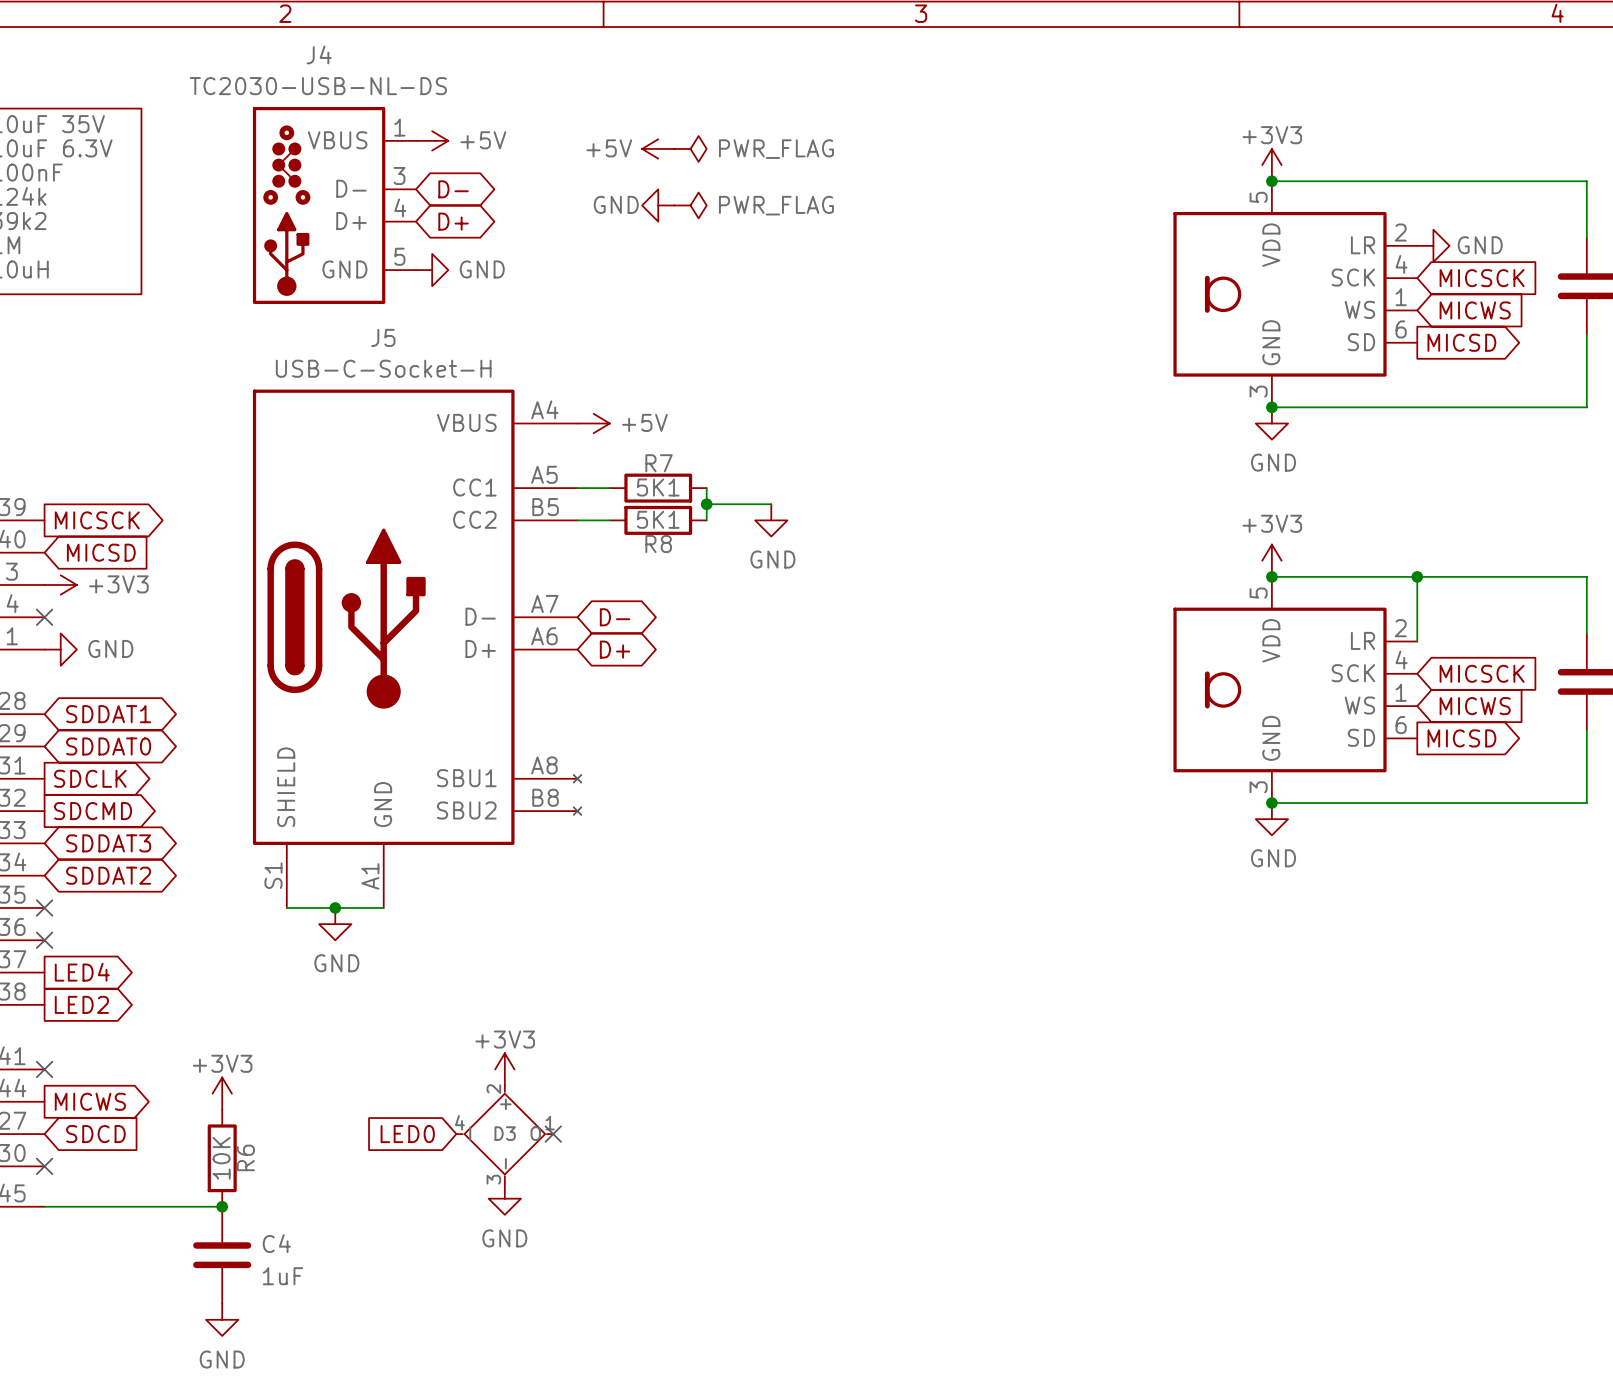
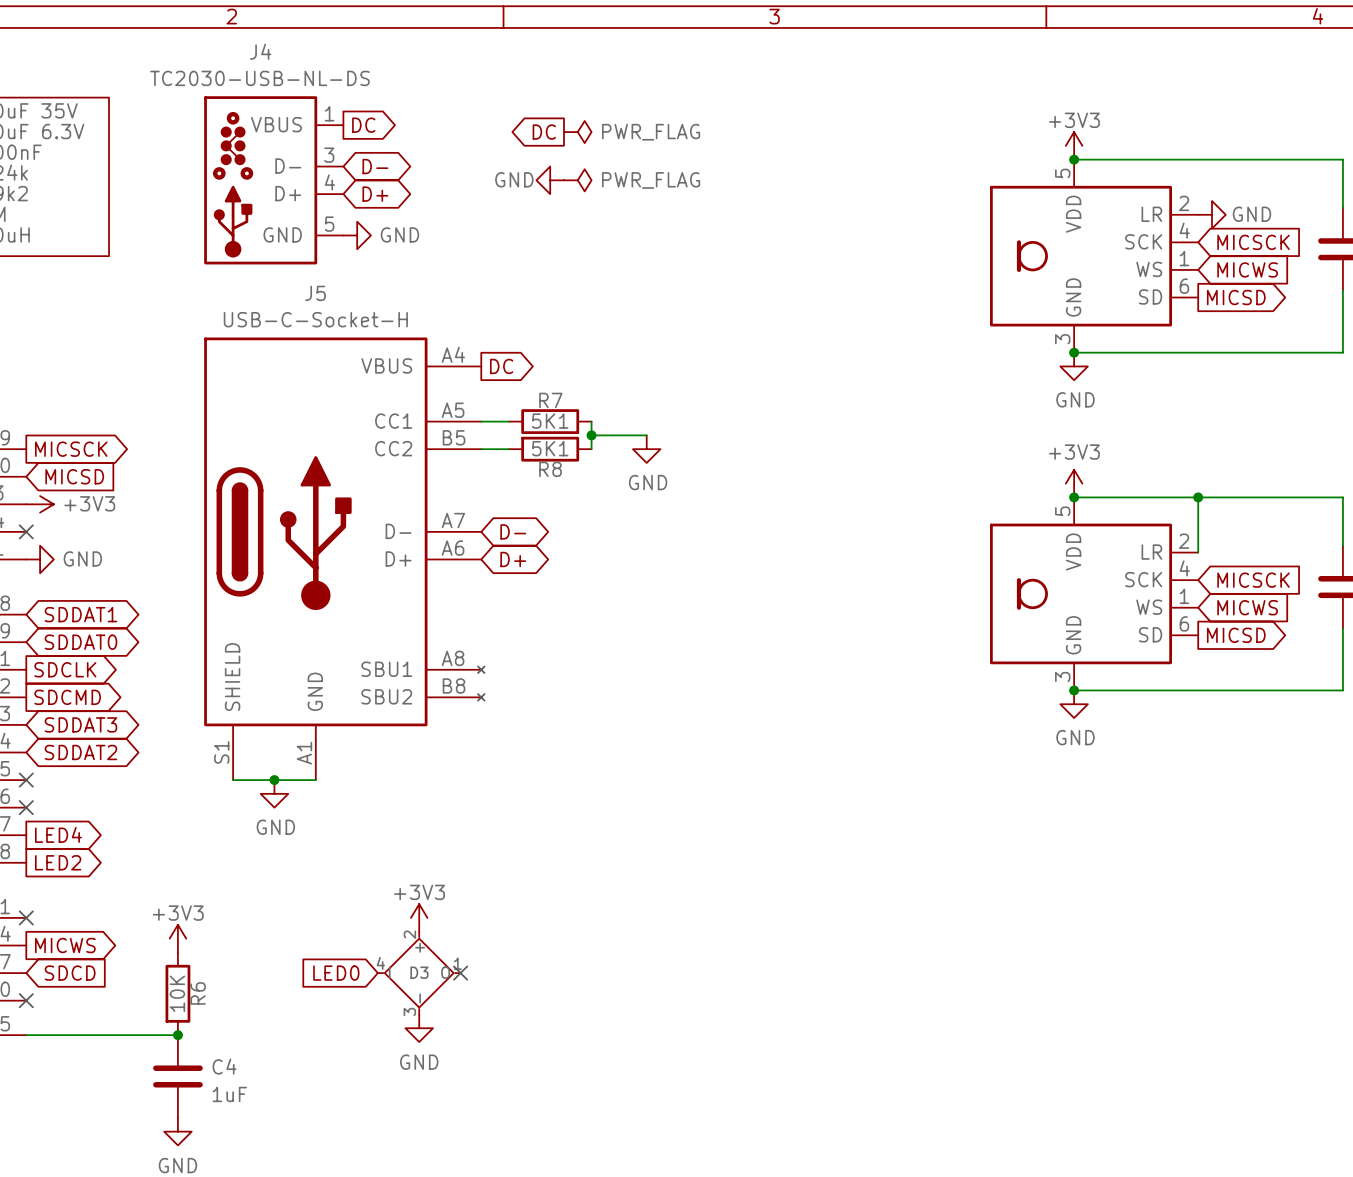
power symbol: +5V (432, 140) -> none
global label: none -> DC (363, 125)
global label: none -> DC (544, 132)
power symbol: +5V (658, 148) -> none
power symbol: +5V (593, 423) -> none
global label: none -> DC (501, 366)

